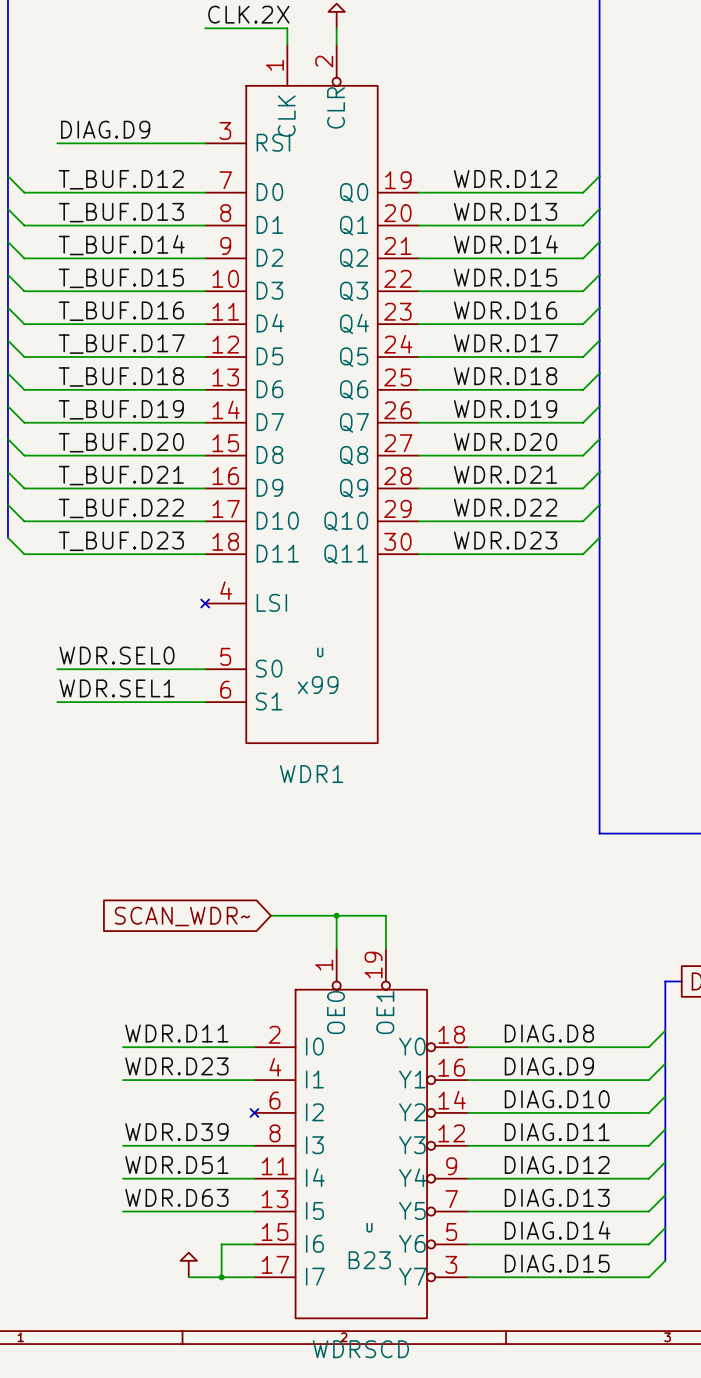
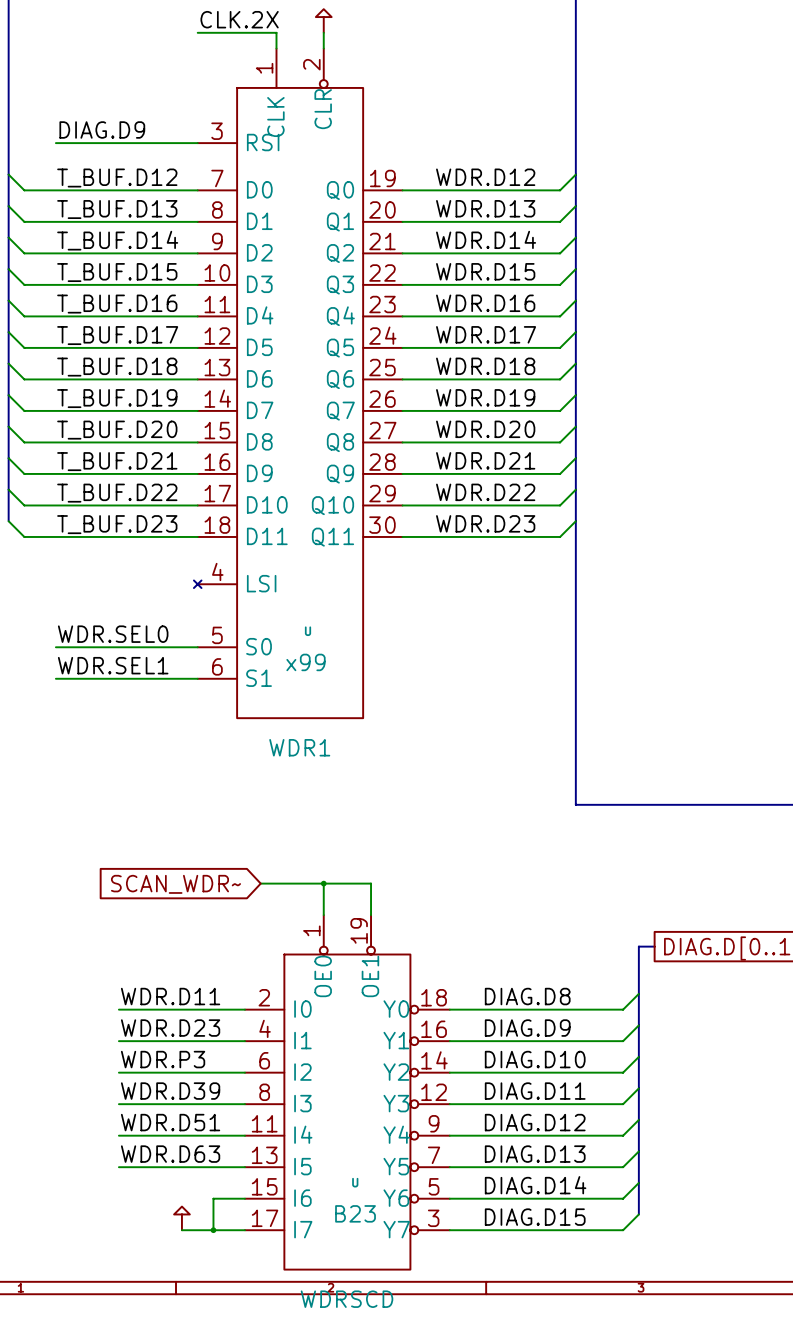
label: none -> WDR.P3 (163, 1059)
wire: none -> (118, 1072) (244, 1072)
no-connect mark: (254, 1112) -> none

